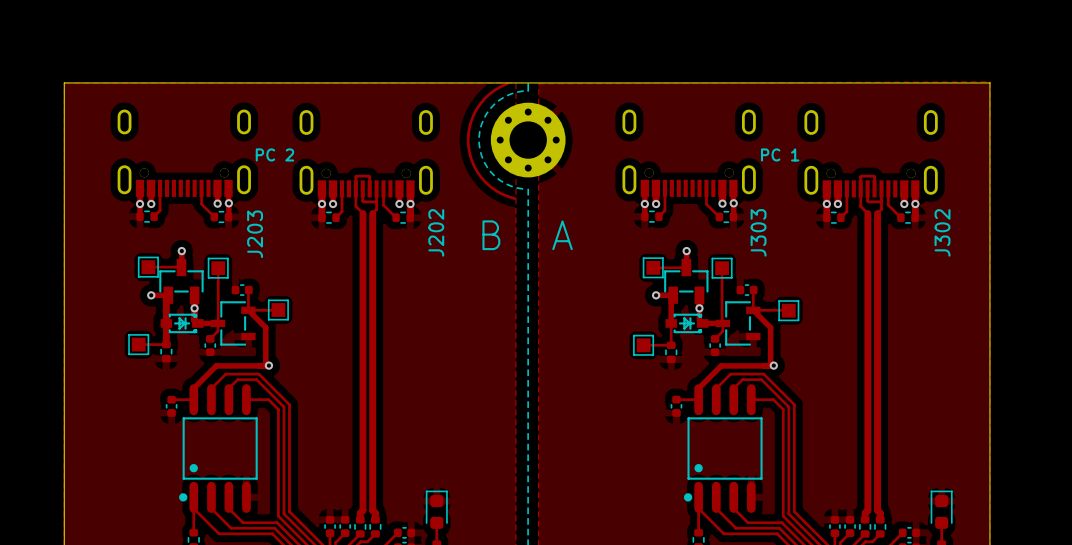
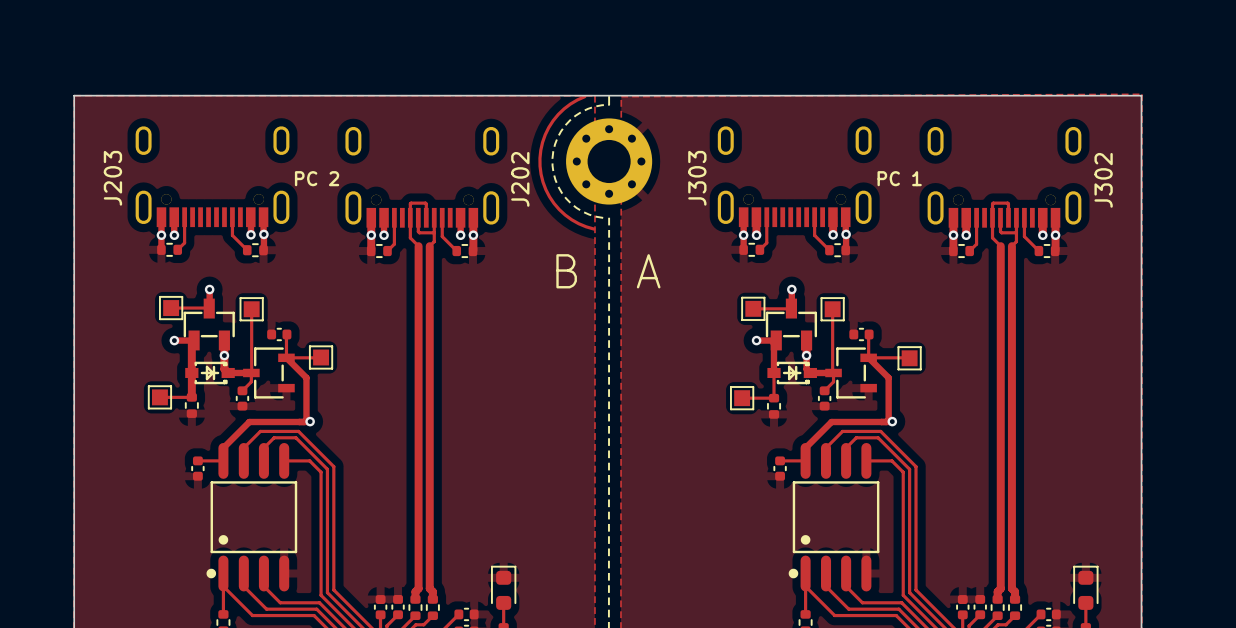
J202 name position: J202 (436, 232) -> J202 (520, 179)
J303 name position: J303 (758, 232) -> J303 (697, 178)
J302 name position: J302 (942, 232) -> J302 (1103, 180)
J203 name position: J203 (255, 234) -> J203 (112, 178)

